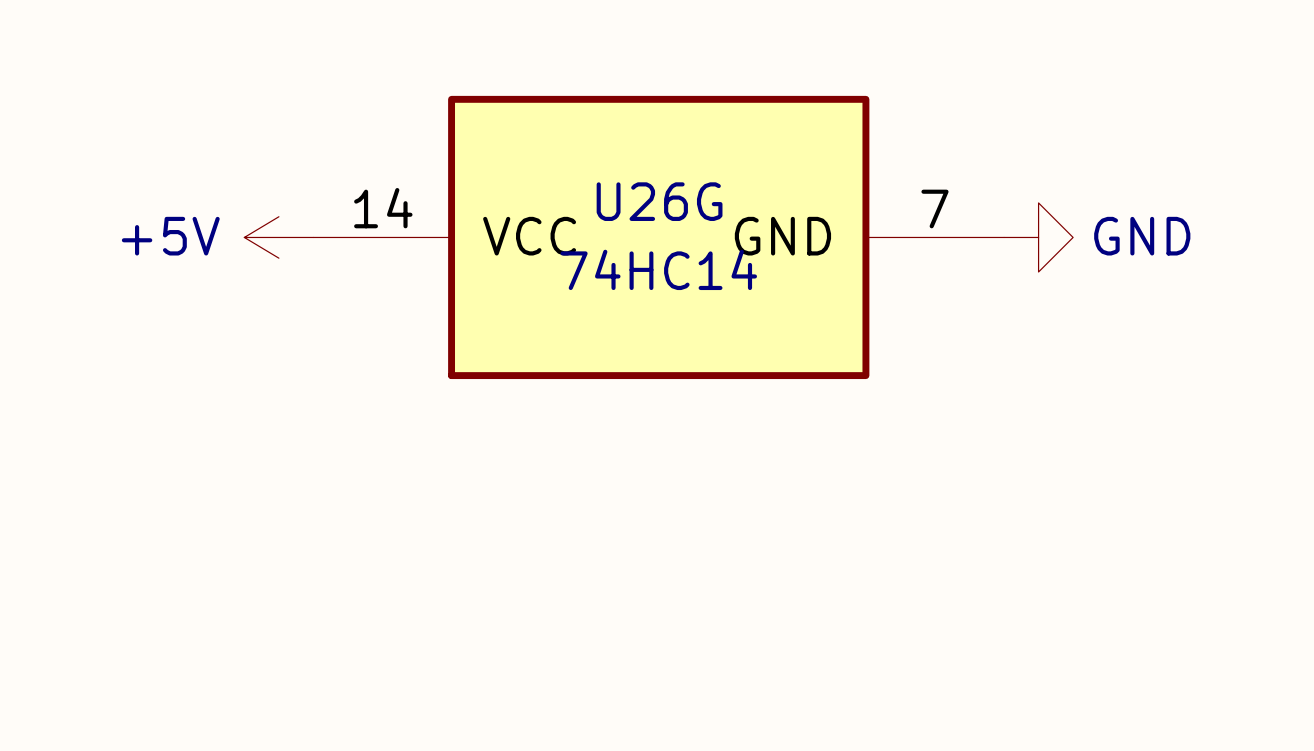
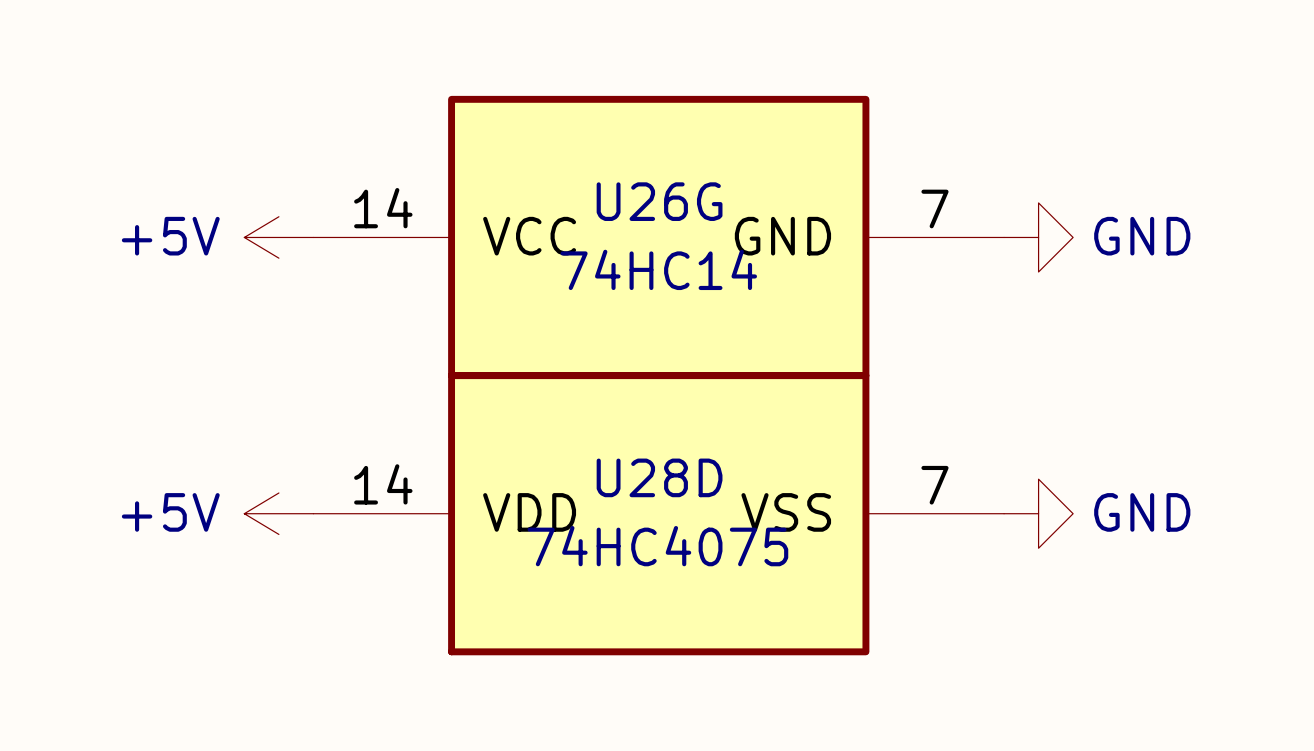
power symbol: none -> +5V (278, 513)
U28D: none -> 74HC4075 (658, 513)
power symbol: none -> GND (1038, 513)

